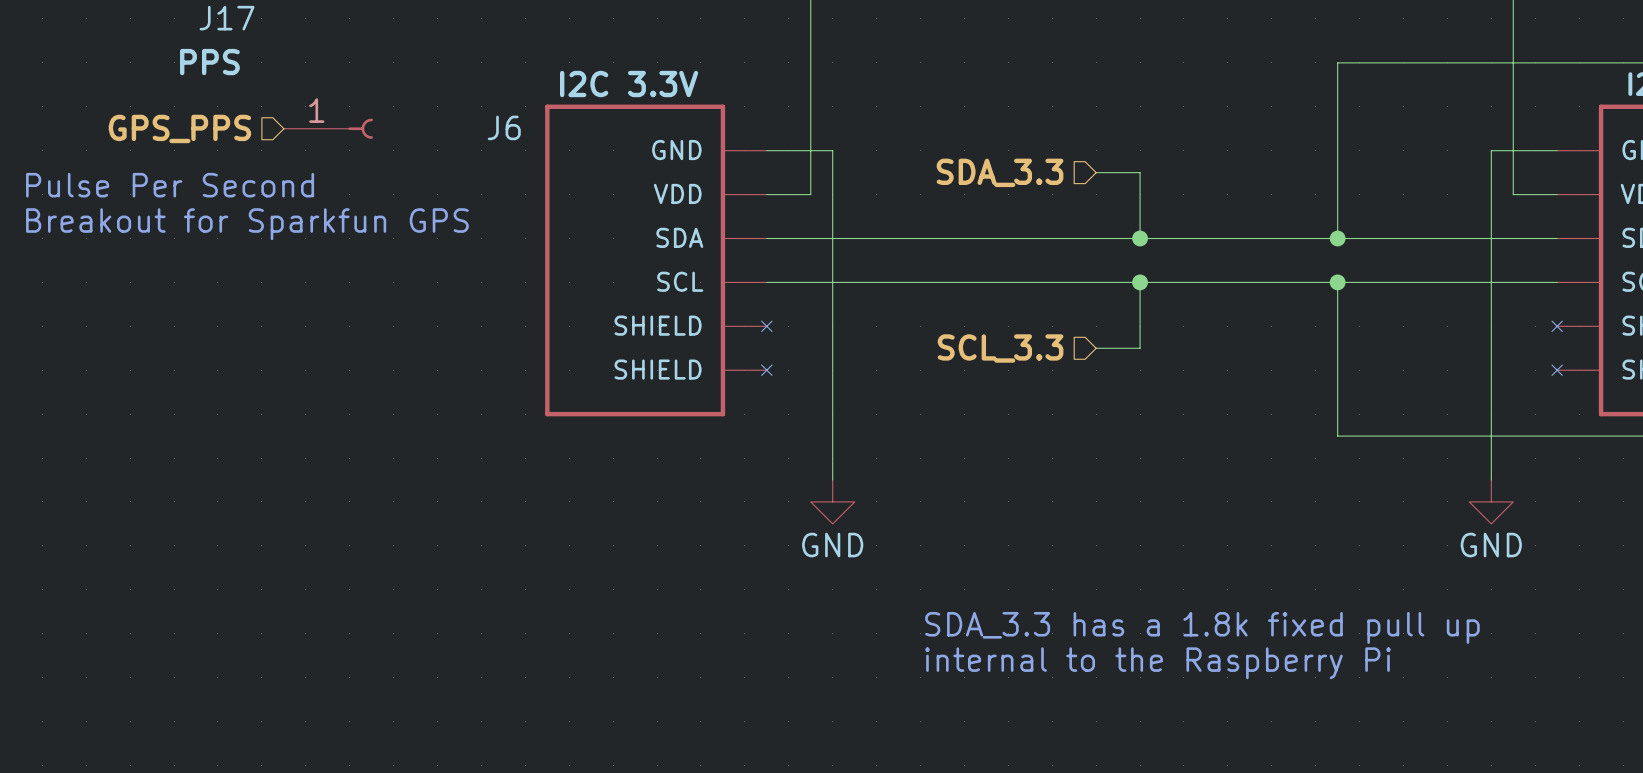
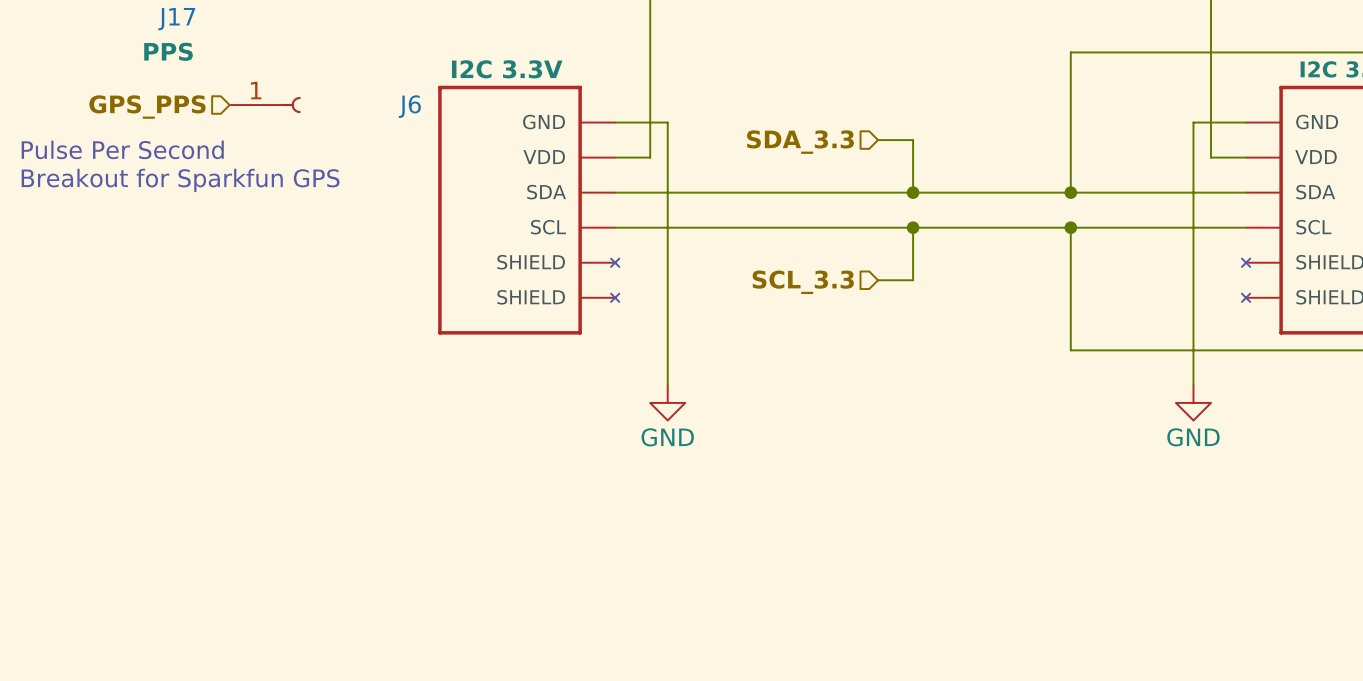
text: SDA_3.3 has a 1.8k fixed pull up (1202, 627) -> none
text: internal to the Raspberry Pi (1157, 663) -> none

